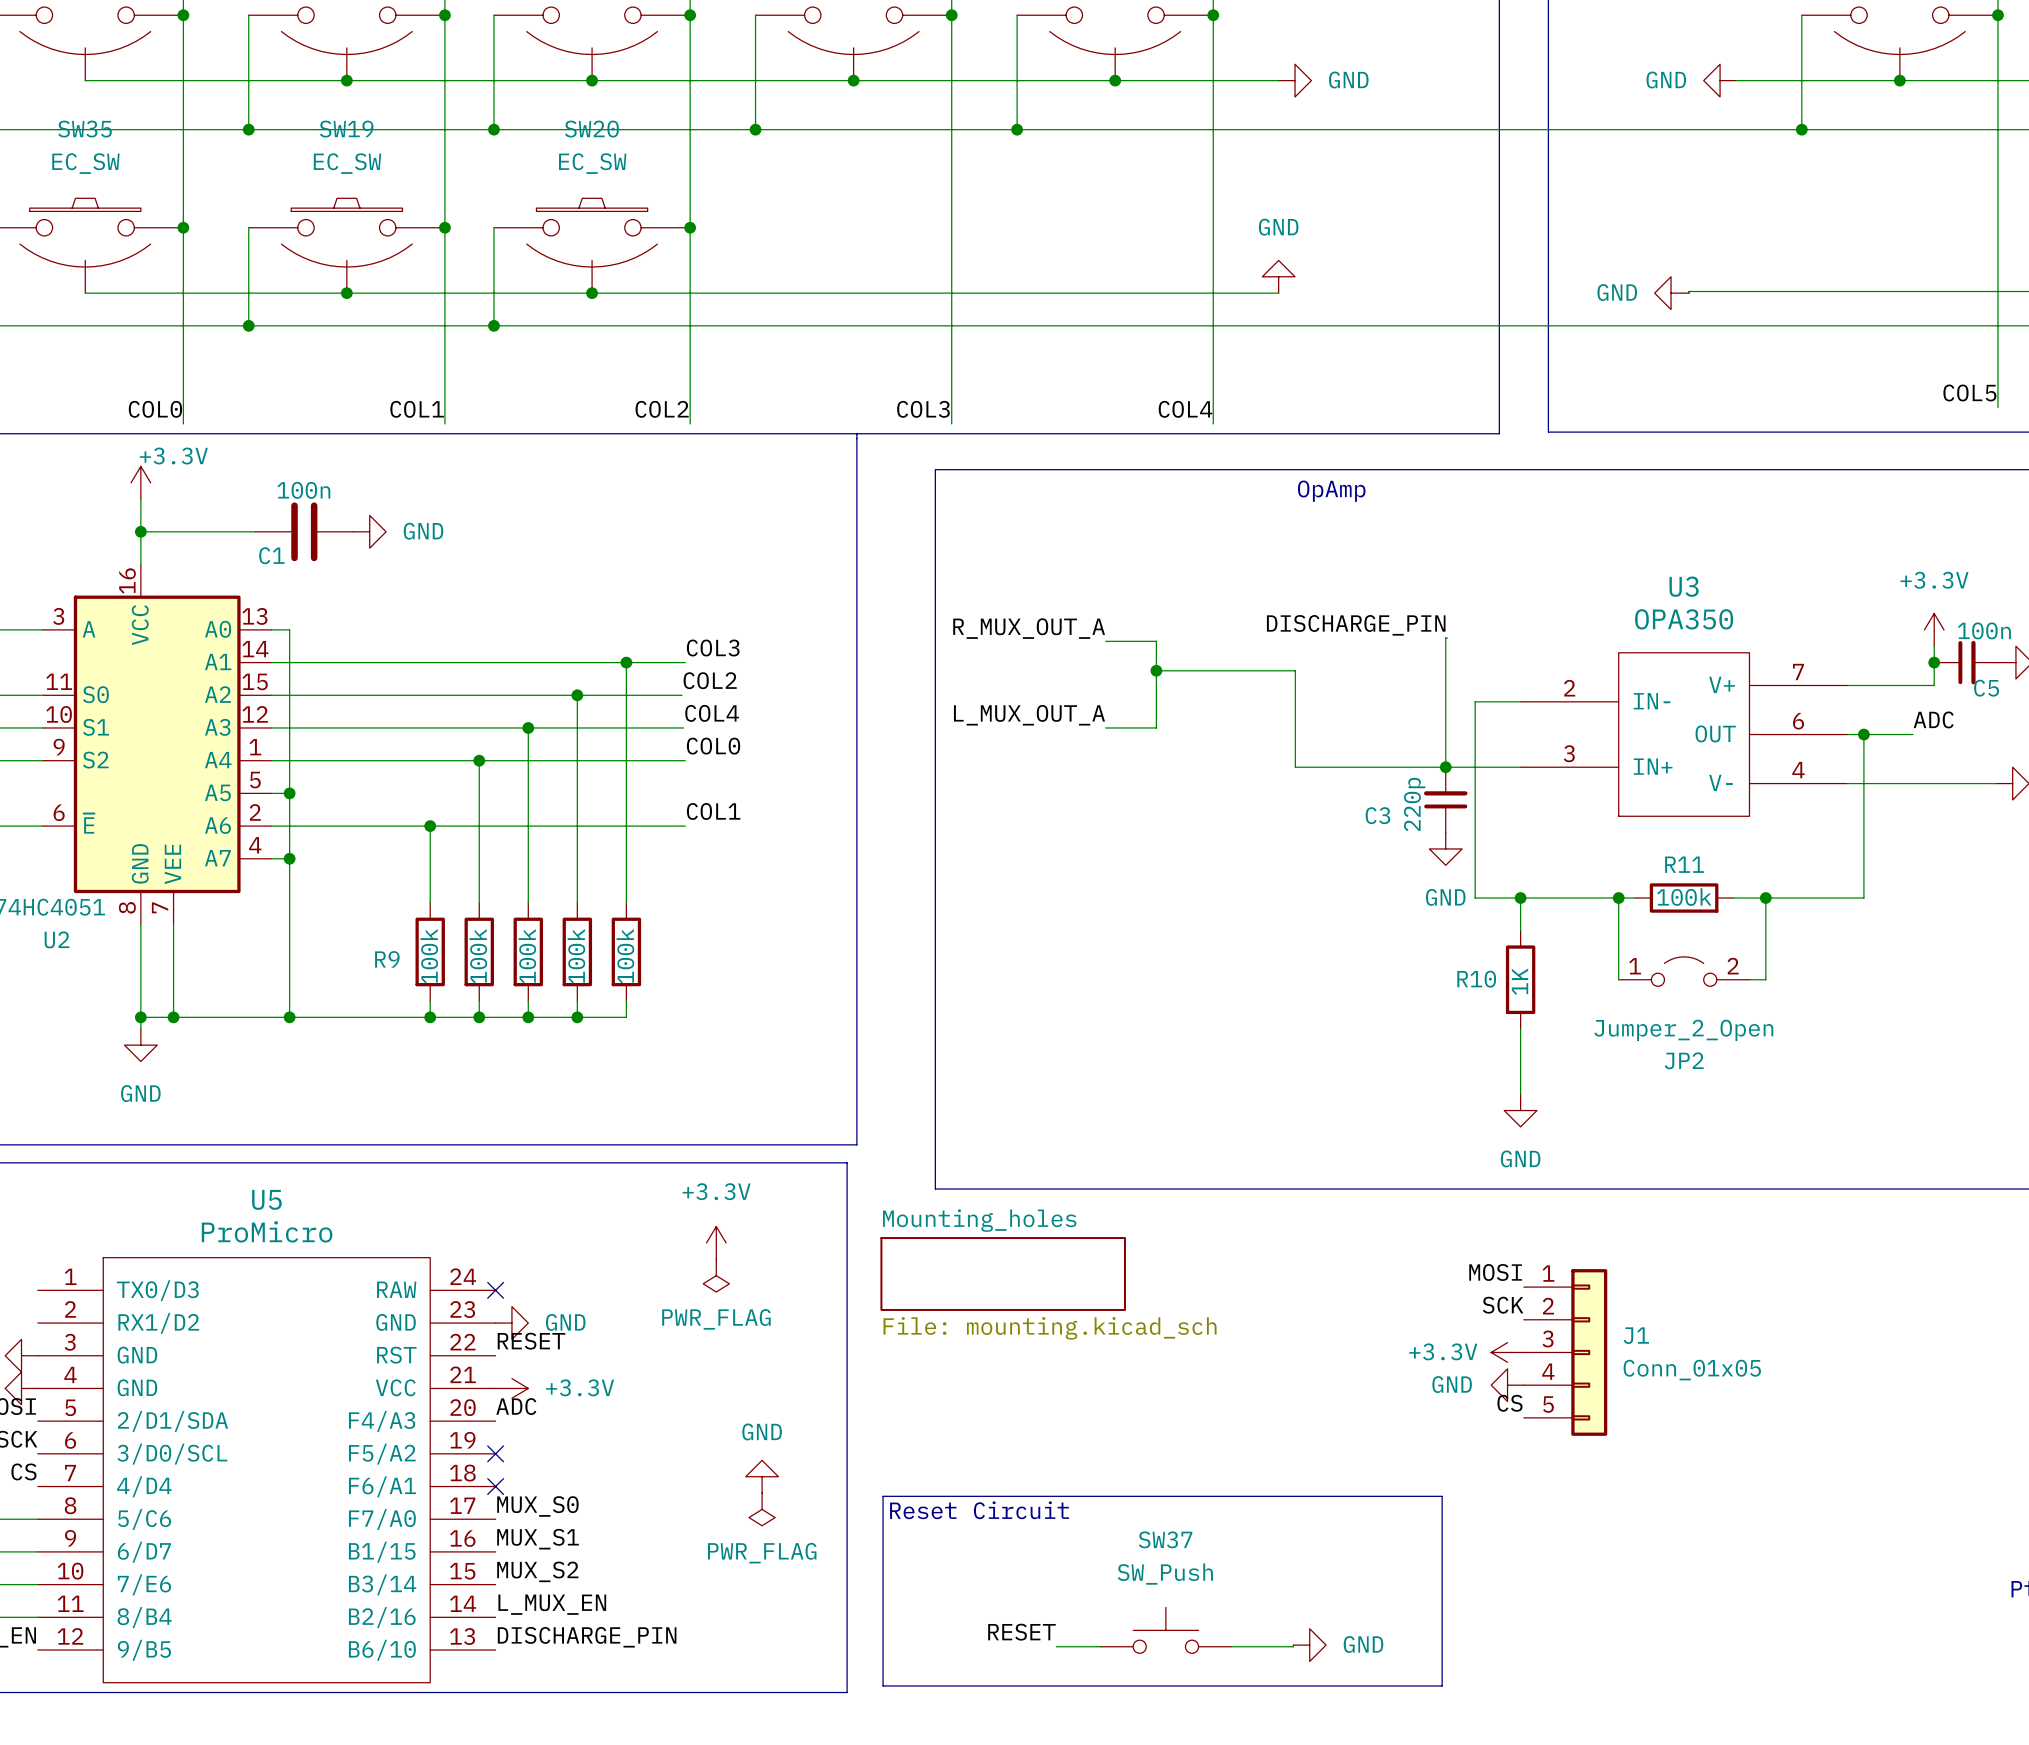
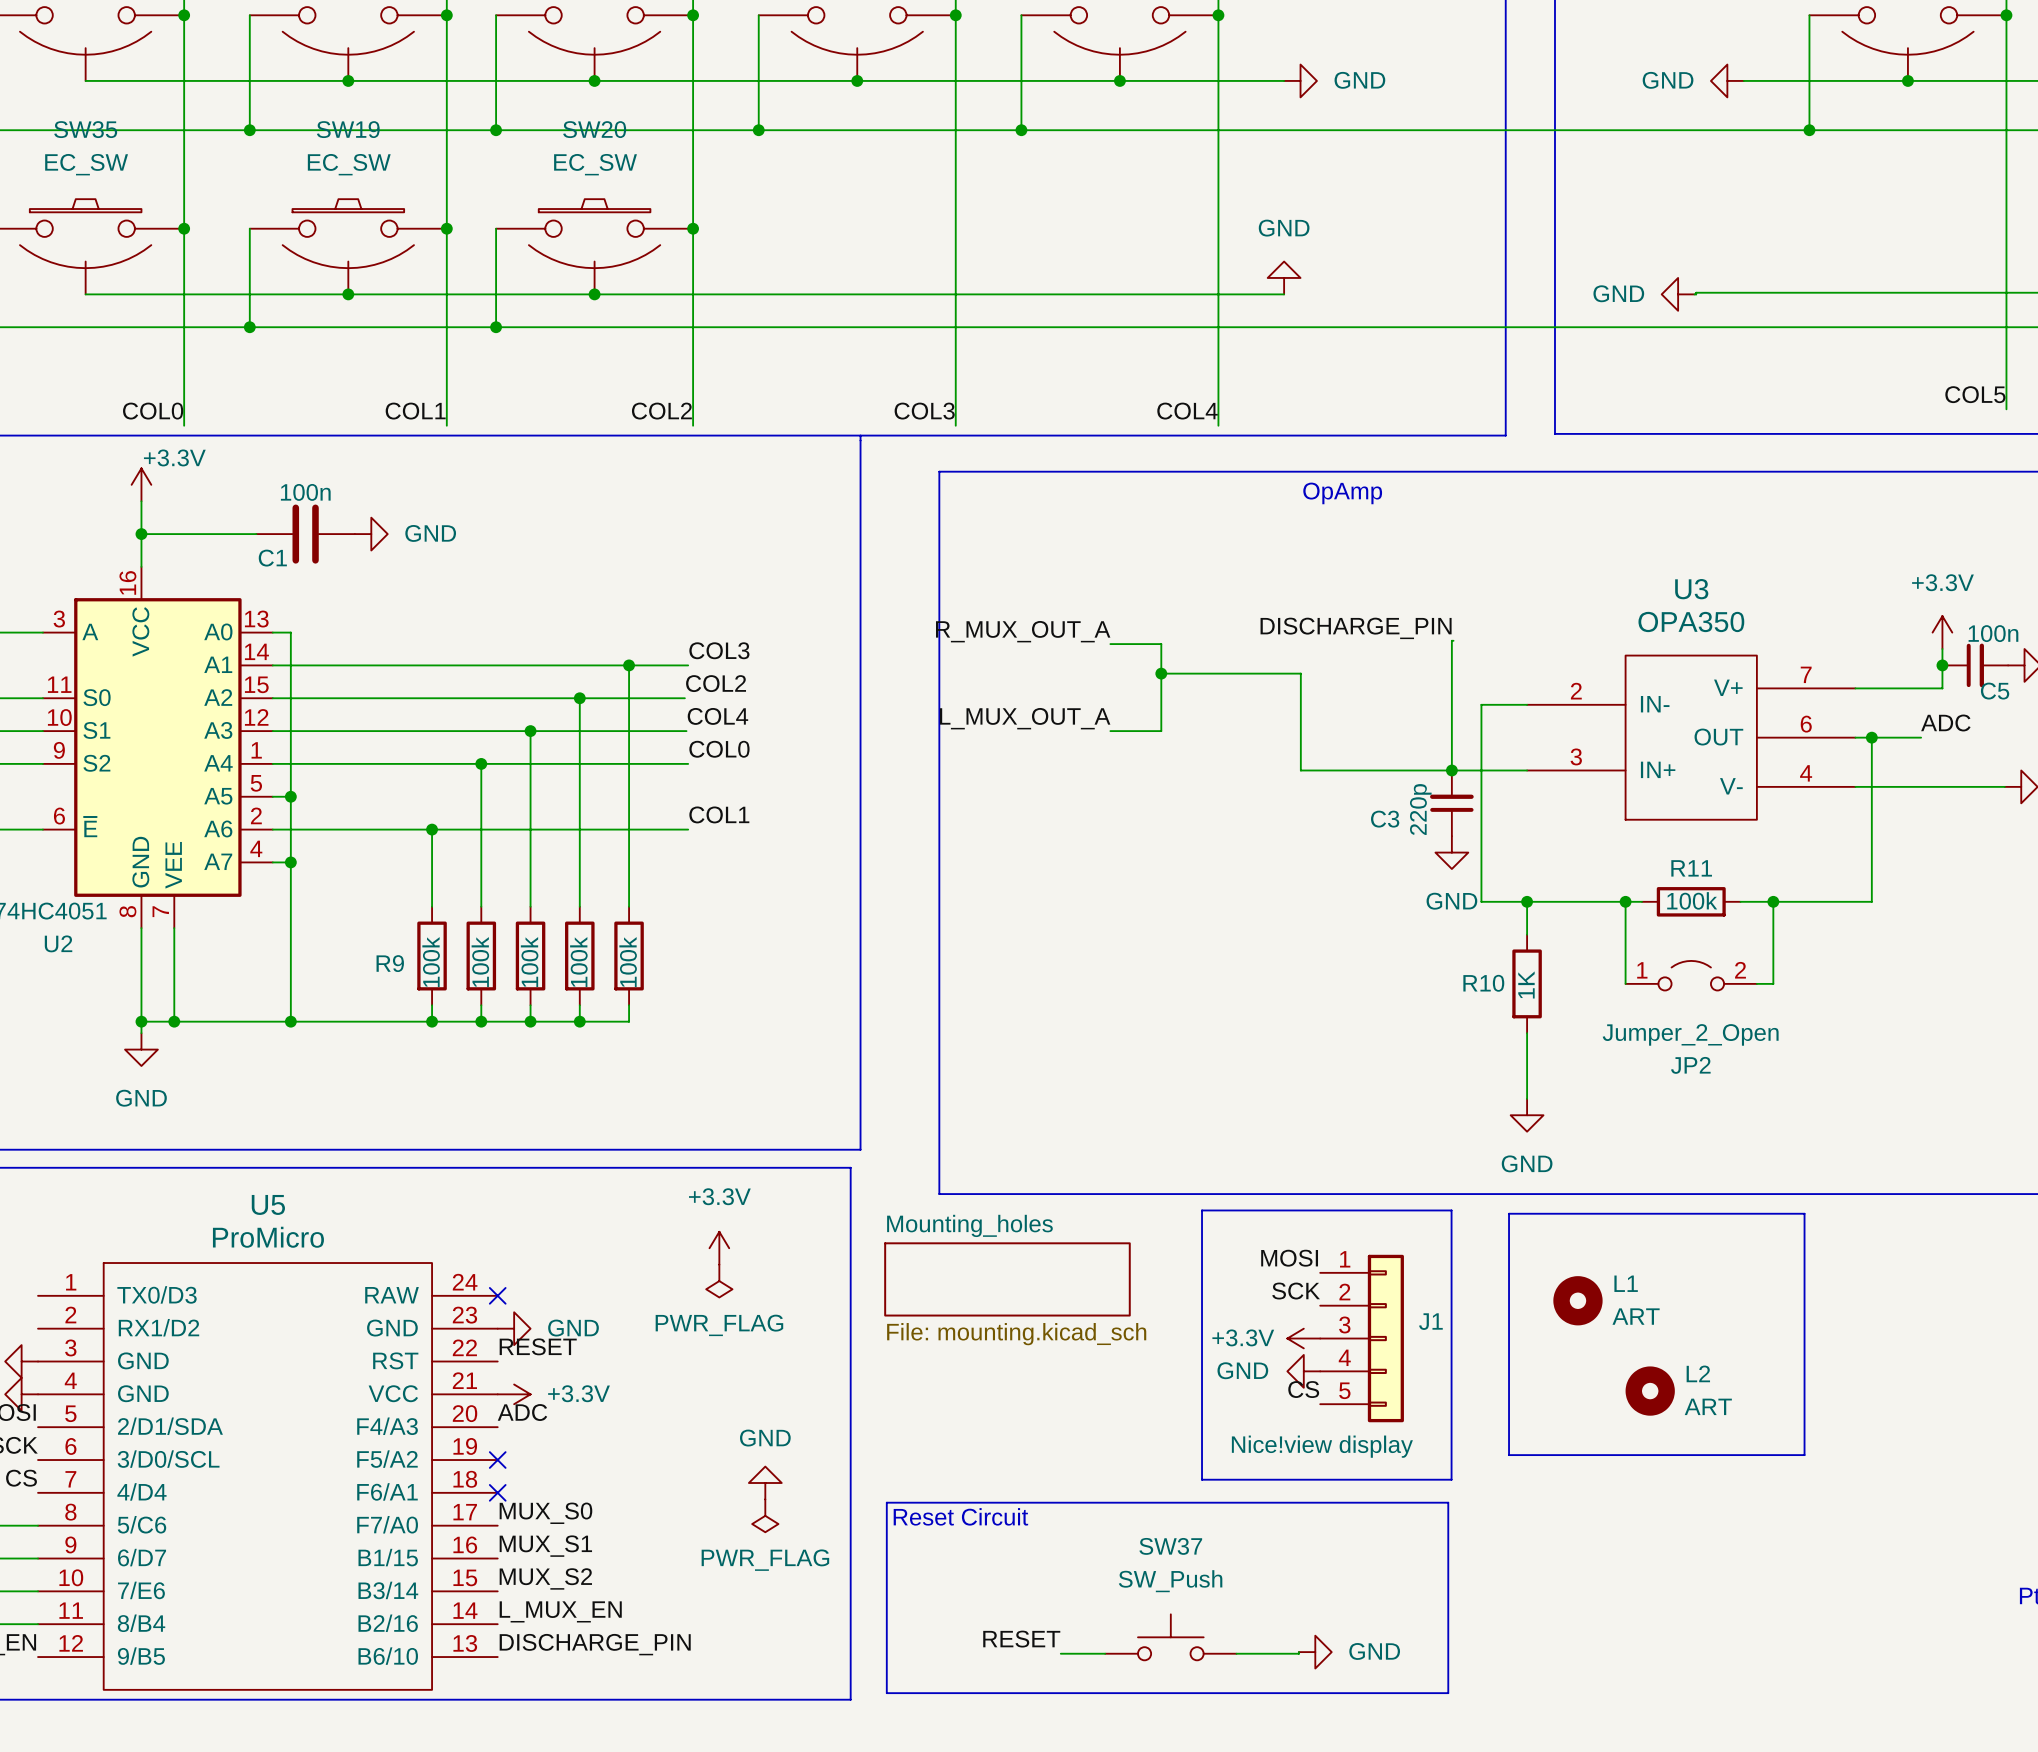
line: none -> (1202, 1210) (1451, 1210) (1451, 1479) (1202, 1479) (1202, 1210)
line: none -> (1509, 1213) (1804, 1213) (1804, 1455) (1509, 1455) (1509, 1213)
label position: MOSI (1495, 1272) -> MOSI (1289, 1258)
L1: none -> ART (1577, 1300)
label position: SCK (1503, 1305) -> SCK (1296, 1291)
power symbol position: +3.3V (1507, 1352) -> +3.3V (1303, 1338)
J1 position: (1565, 1352) -> (1362, 1338)
J1 value: Conn_01x05 (1692, 1370) -> Nice!view display (1322, 1446)
power symbol position: GND (1507, 1385) -> GND (1303, 1371)
L2: none -> ART (1650, 1391)
label position: CS (1509, 1403) -> CS (1303, 1389)

